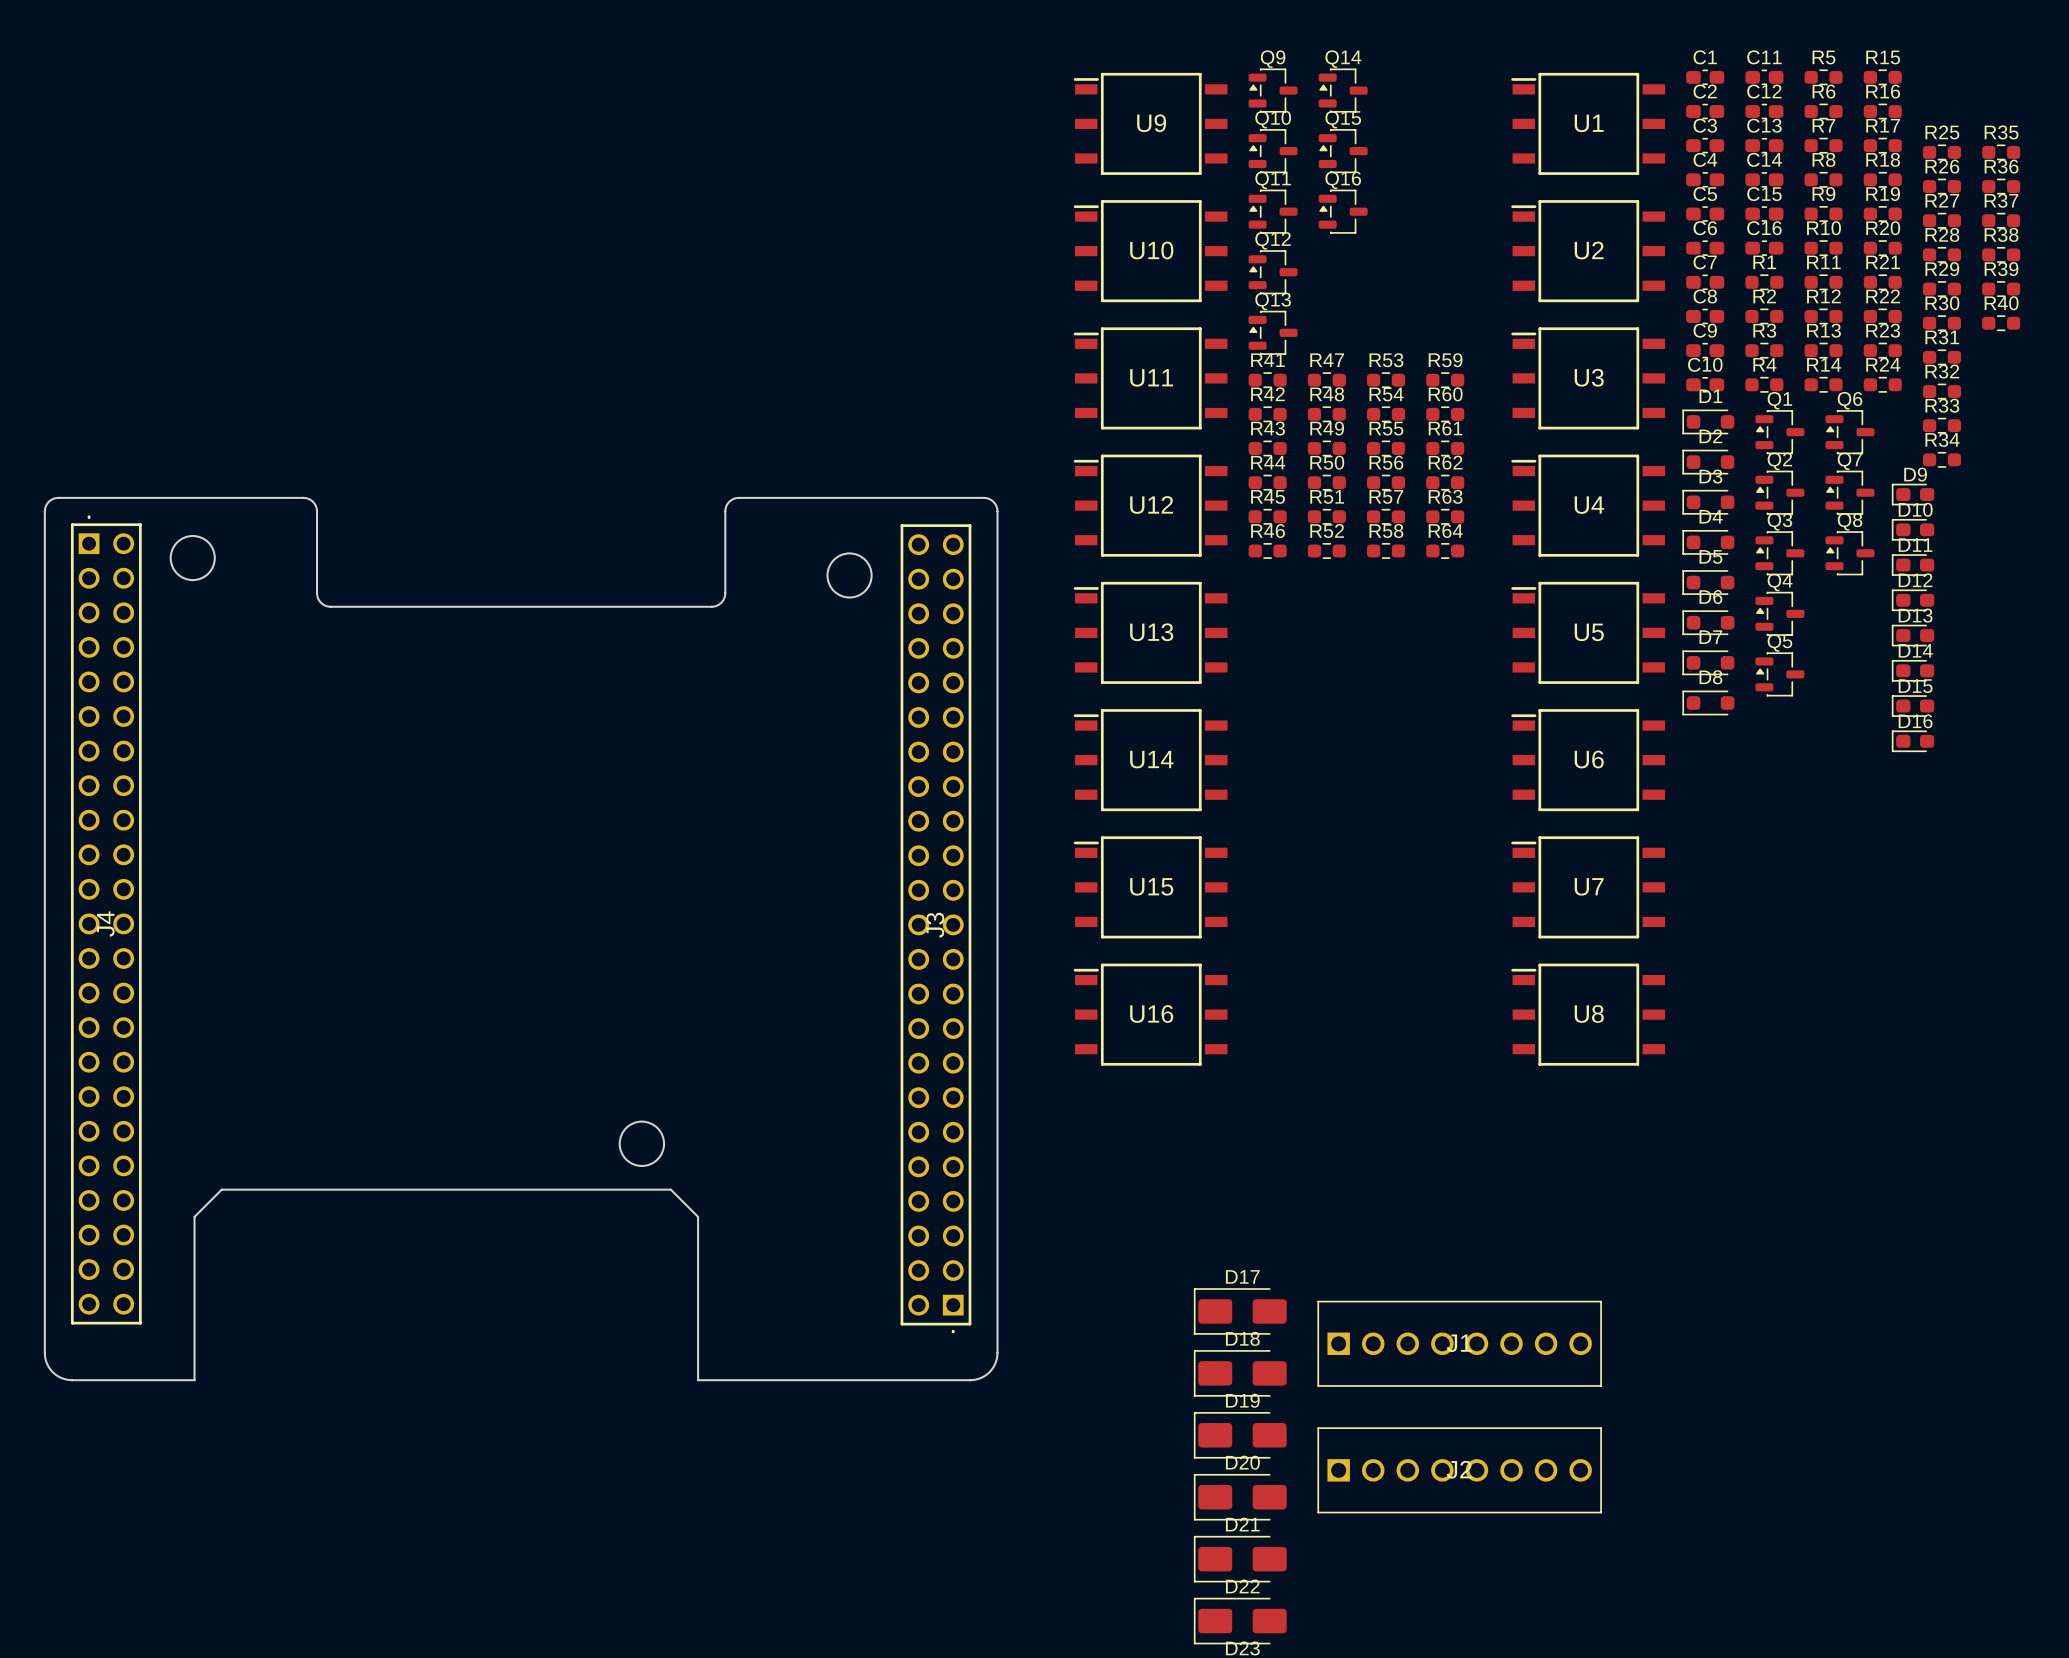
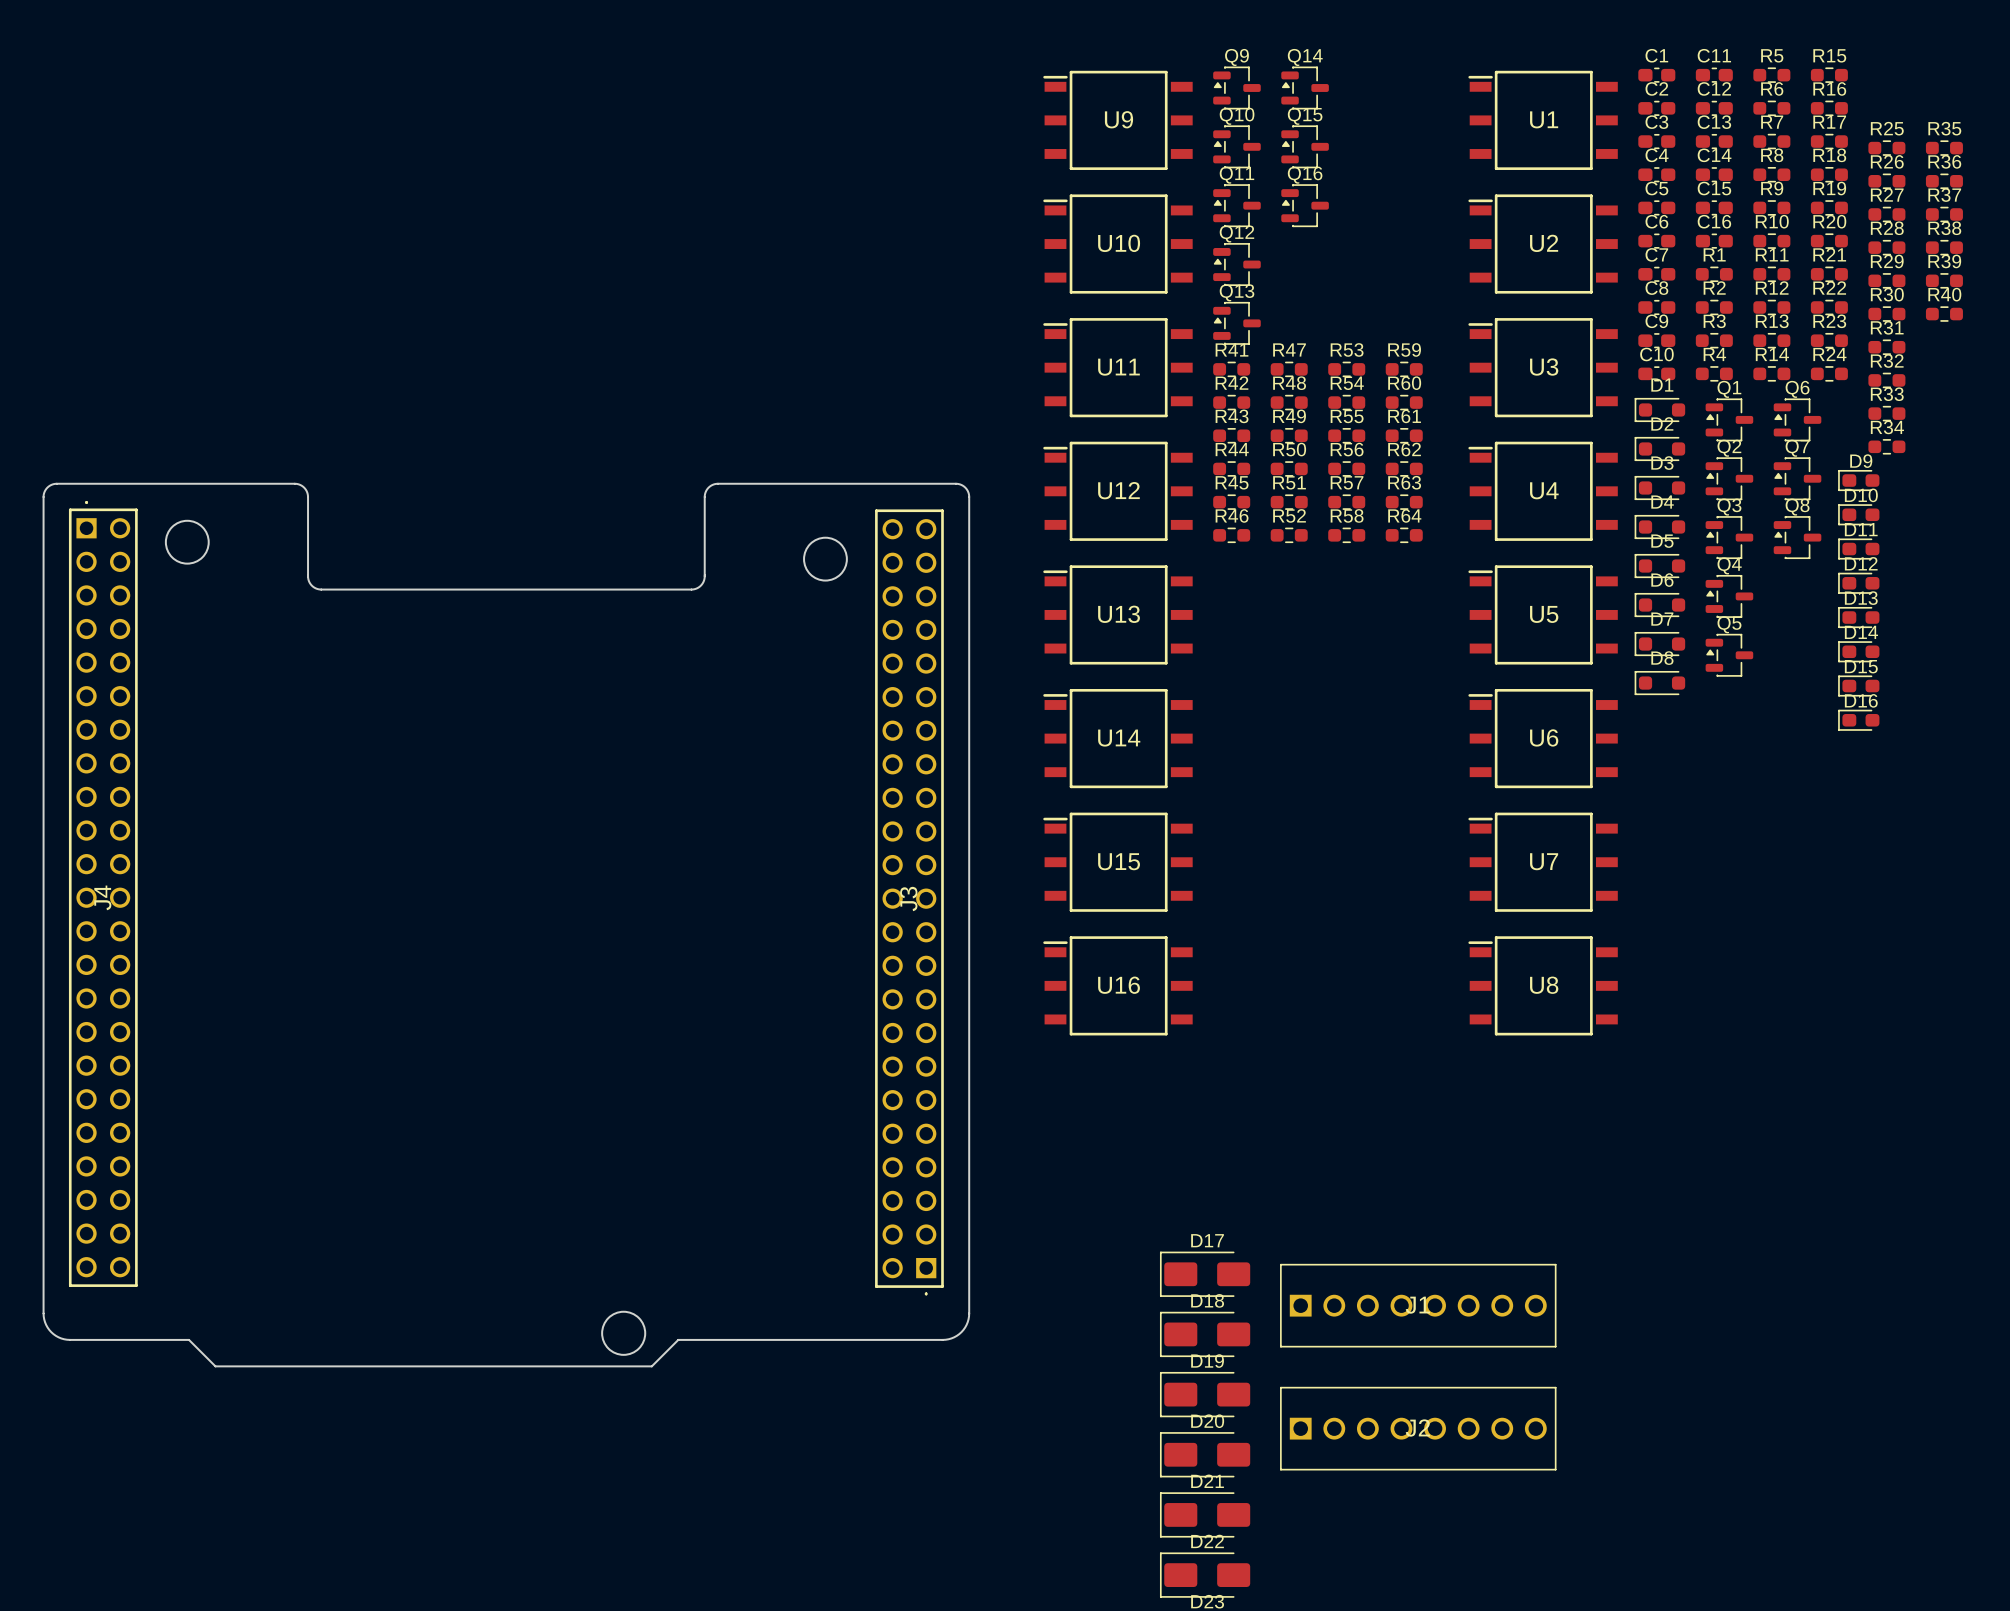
round board edge position: (641, 1143) -> (623, 1333)
board edge: (44, 1351) (46, 1361) (50, 1369) (57, 1376) (65, 1379) (194, 1380) (194, 1216) (221, 1189) (670, 1189) (698, 1216) (698, 1380) (973, 1380) (984, 1376) (991, 1369) (995, 1361) (997, 1351) -> (43, 1313) (49, 1329) (61, 1338) (189, 1339) (215, 1366) (651, 1366) (678, 1339) (945, 1339) (961, 1332) (966, 1324) (969, 1313)

